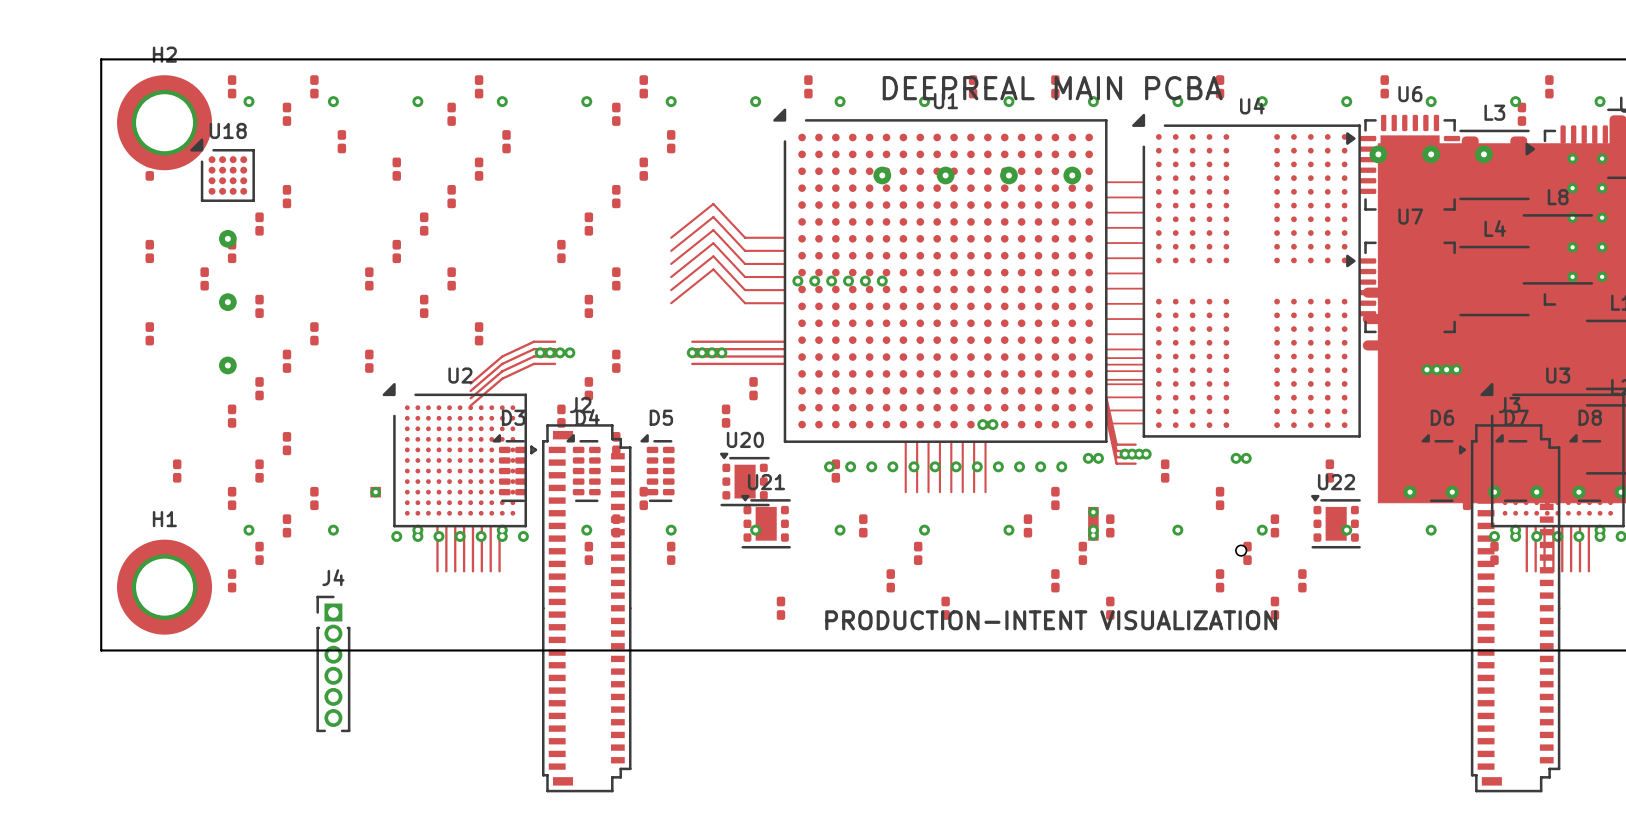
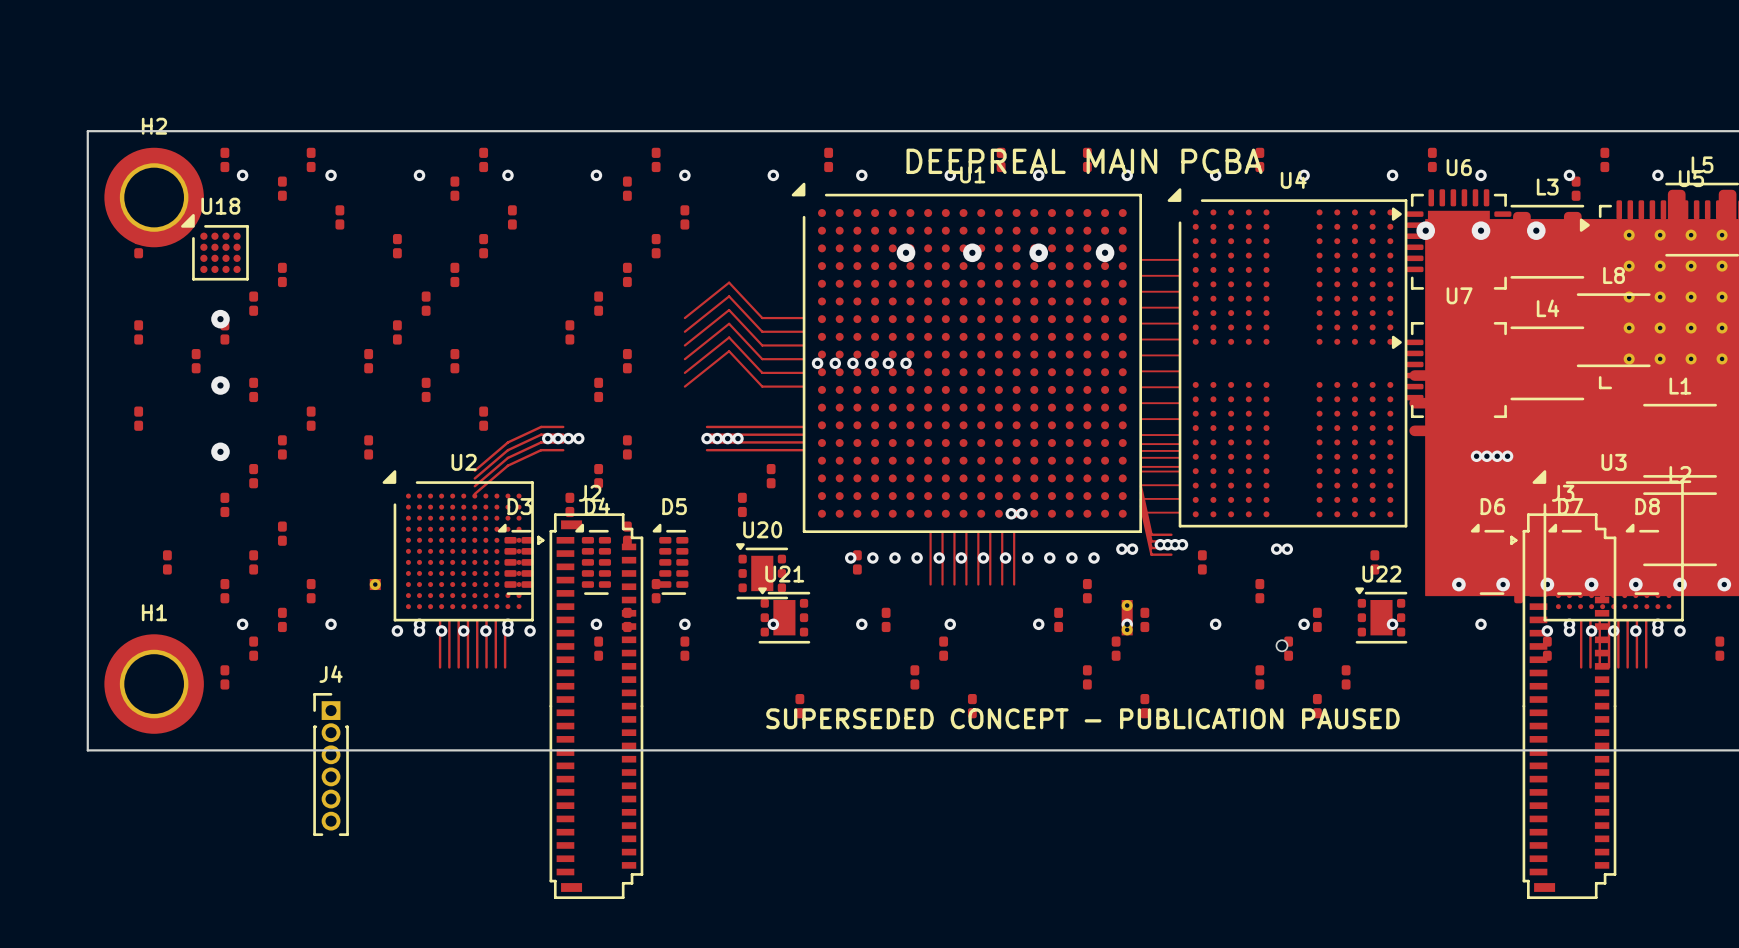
text: PRODUCTION-INTENT VISUALIZATION (1051, 620) -> SUPERSEDED CONCEPT - PUBLICATION PAUSED (1082, 718)

